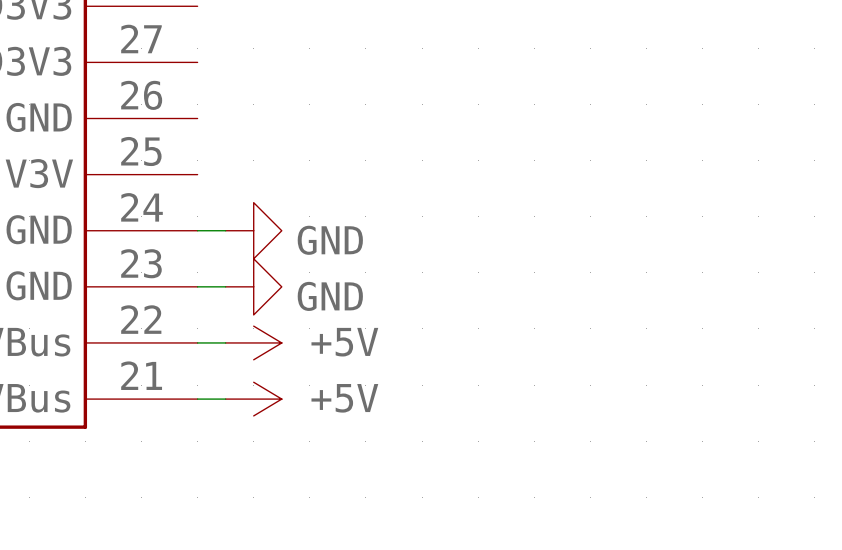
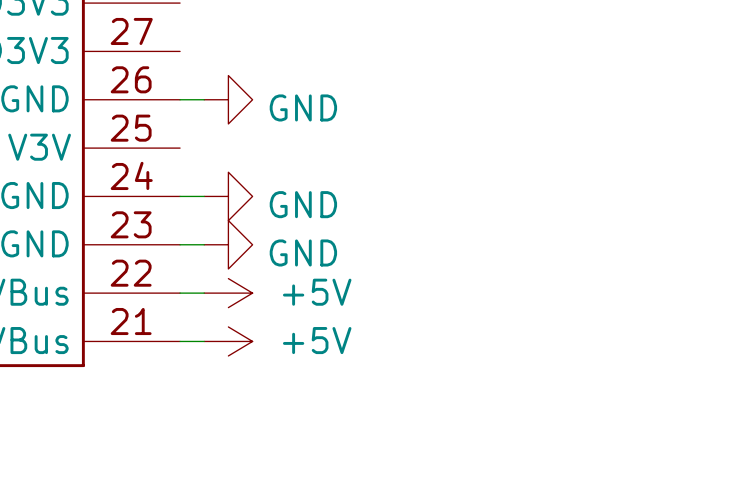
wire: none -> (180, 99) (204, 99)
power symbol: none -> GND (228, 99)

